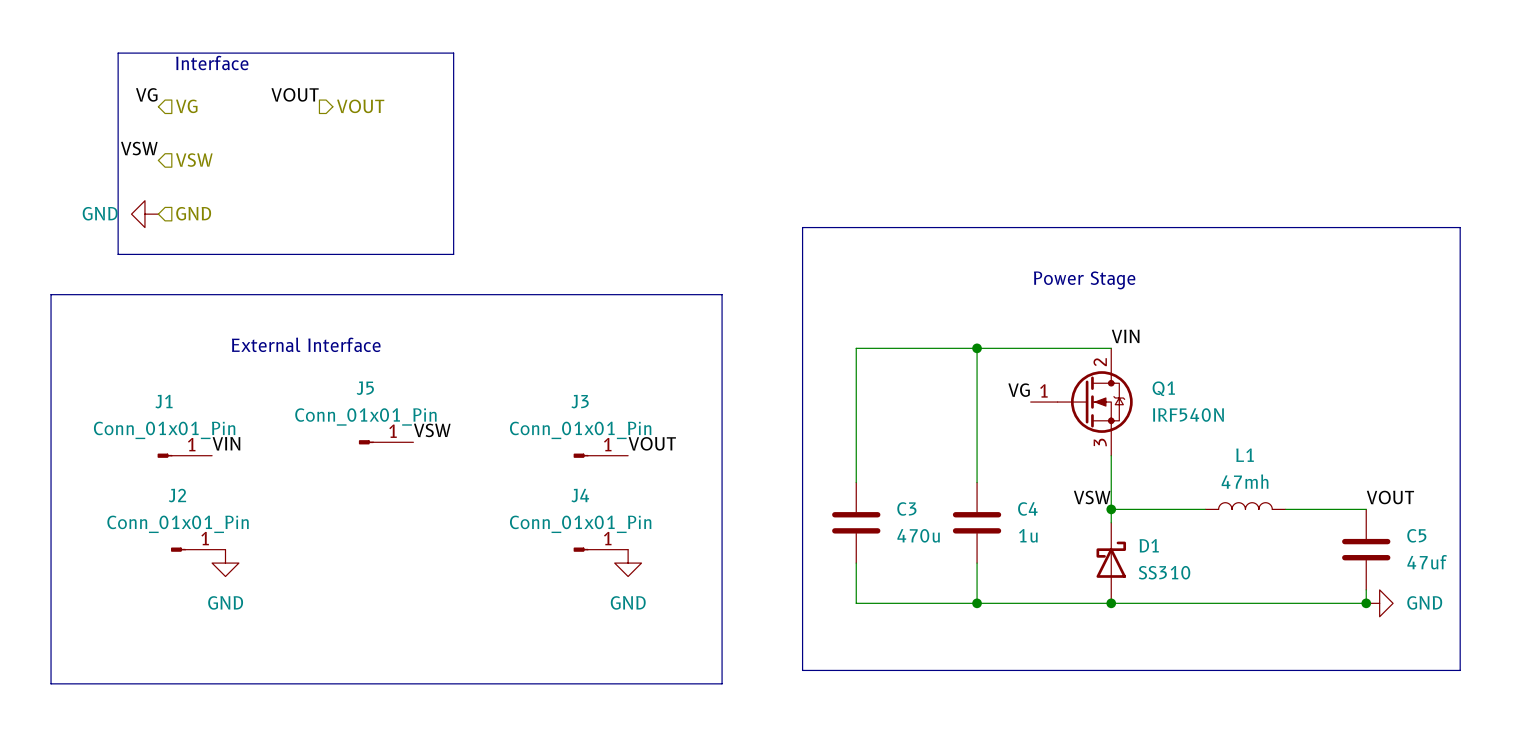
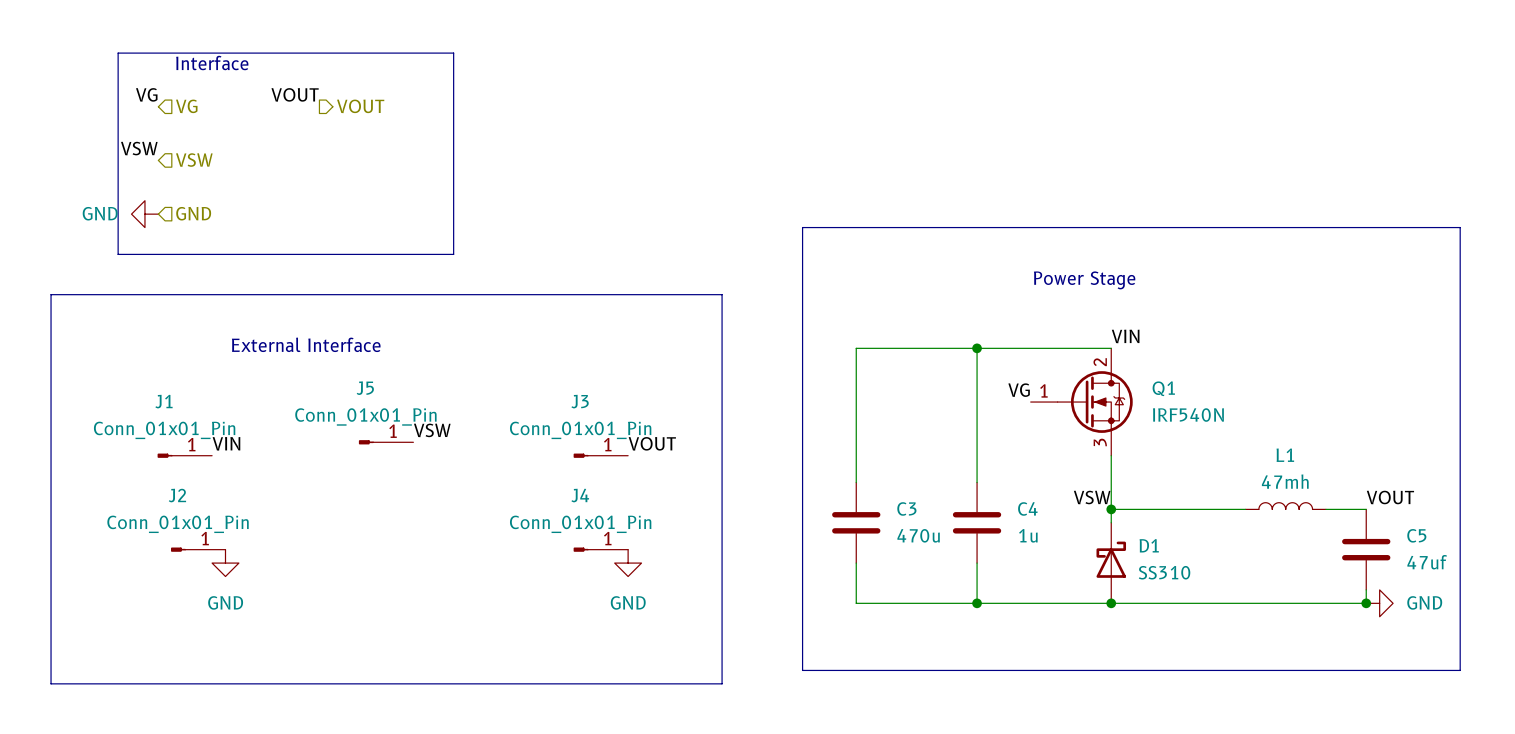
L1 position: (1245, 506) -> (1285, 506)
wire: (1285, 509) (1325, 509) -> (1205, 509) (1245, 509)

